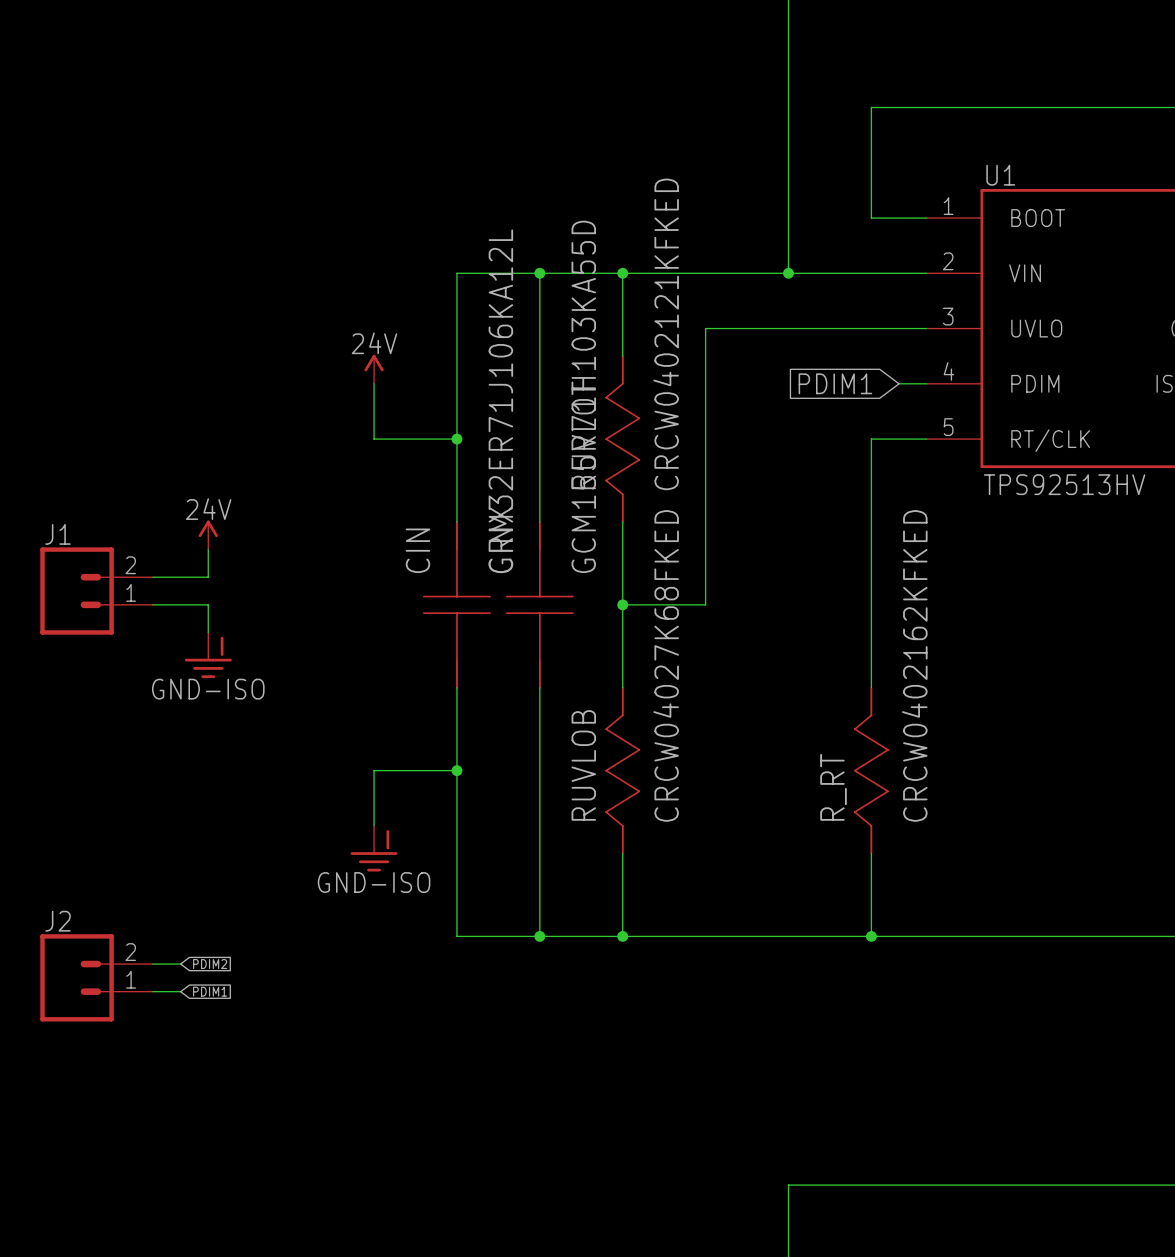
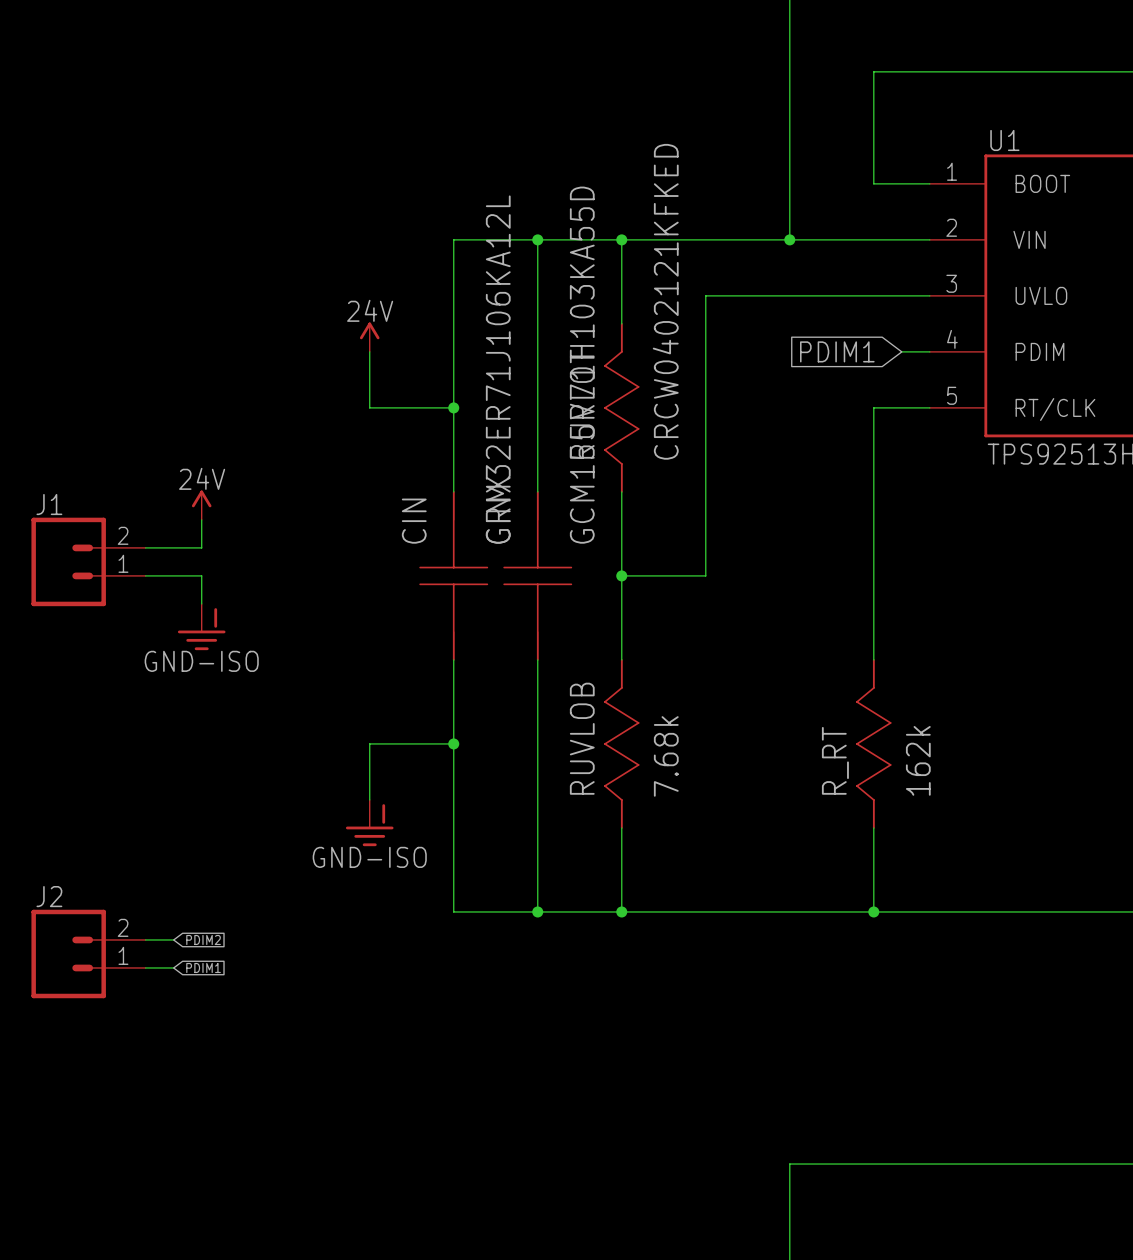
RUVLOB value: CRCW04027K68FKED (666, 665) -> 7.68k (666, 756)
R_RT value: CRCW0402162KFKED (914, 665) -> 162k (918, 760)

